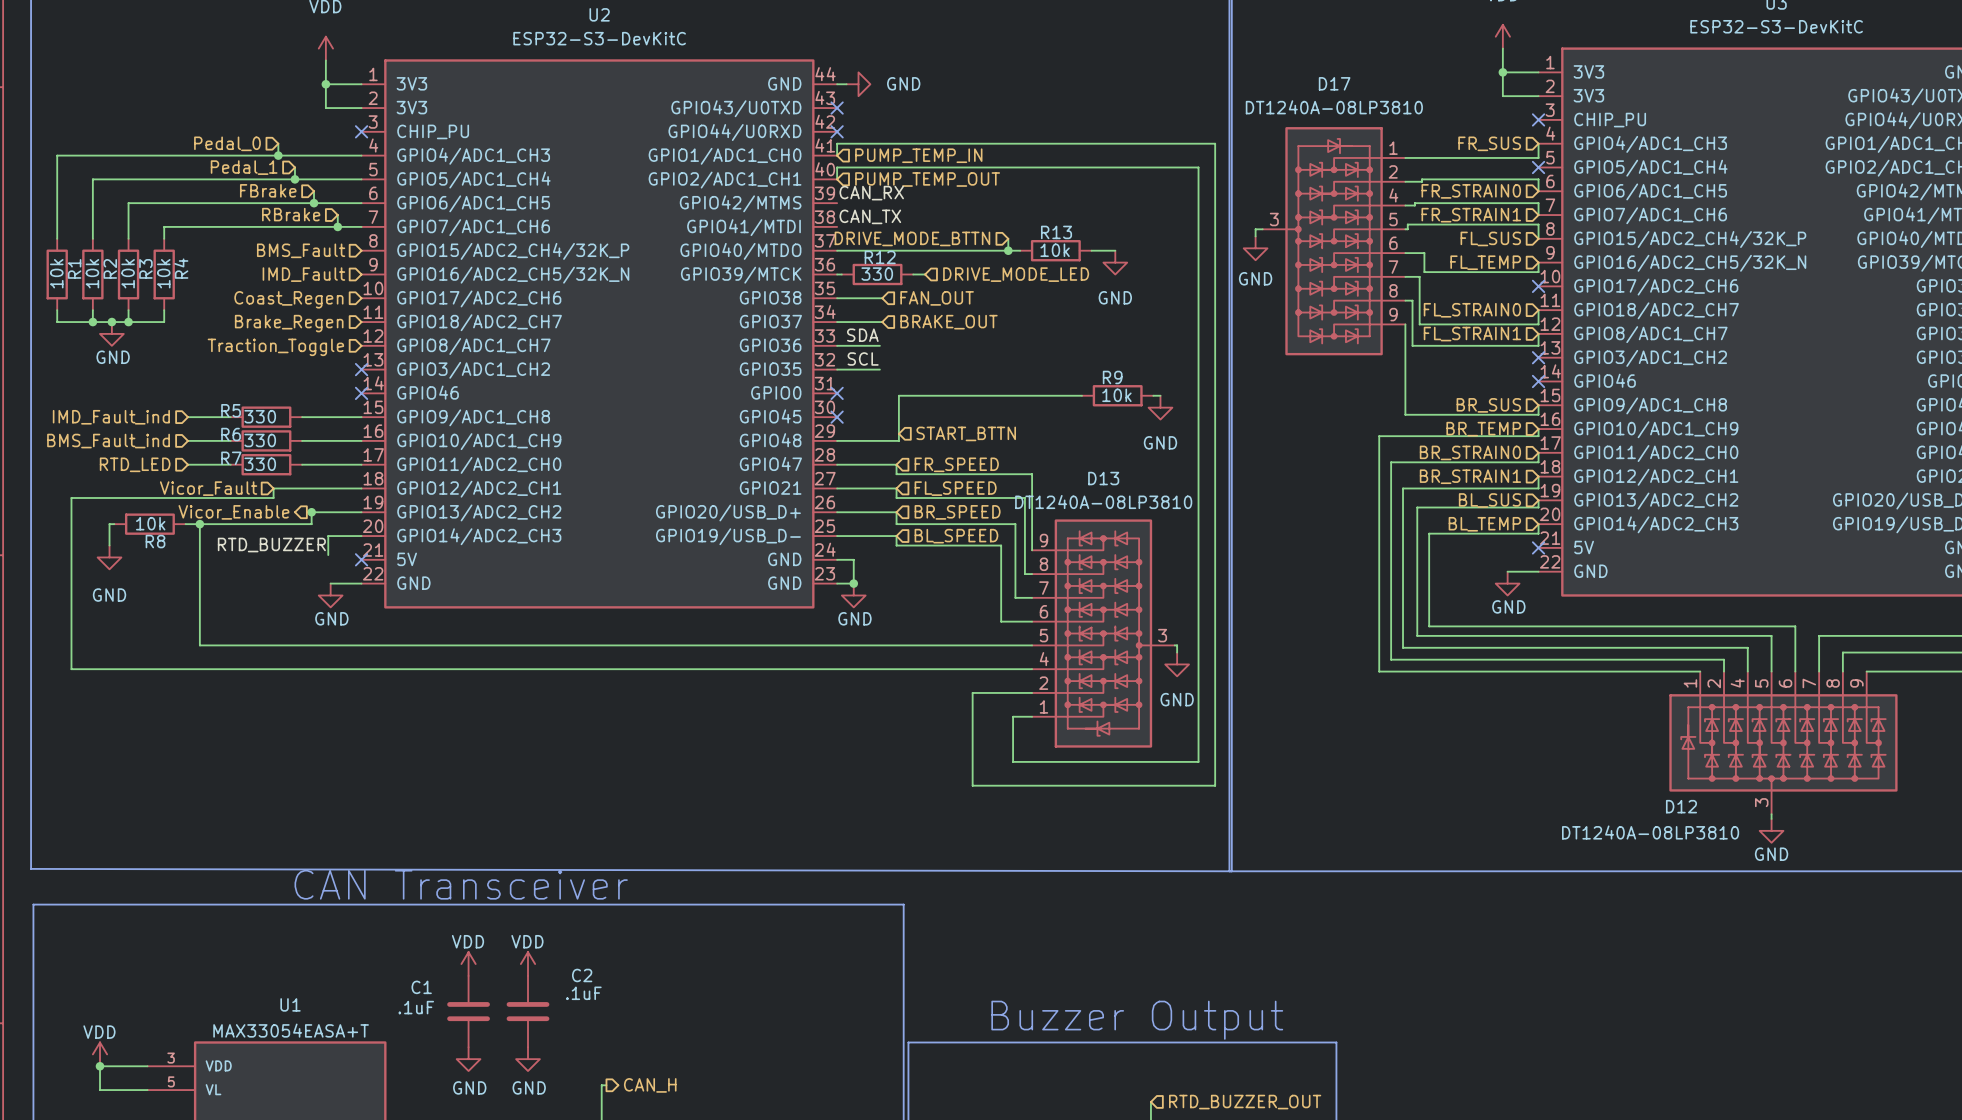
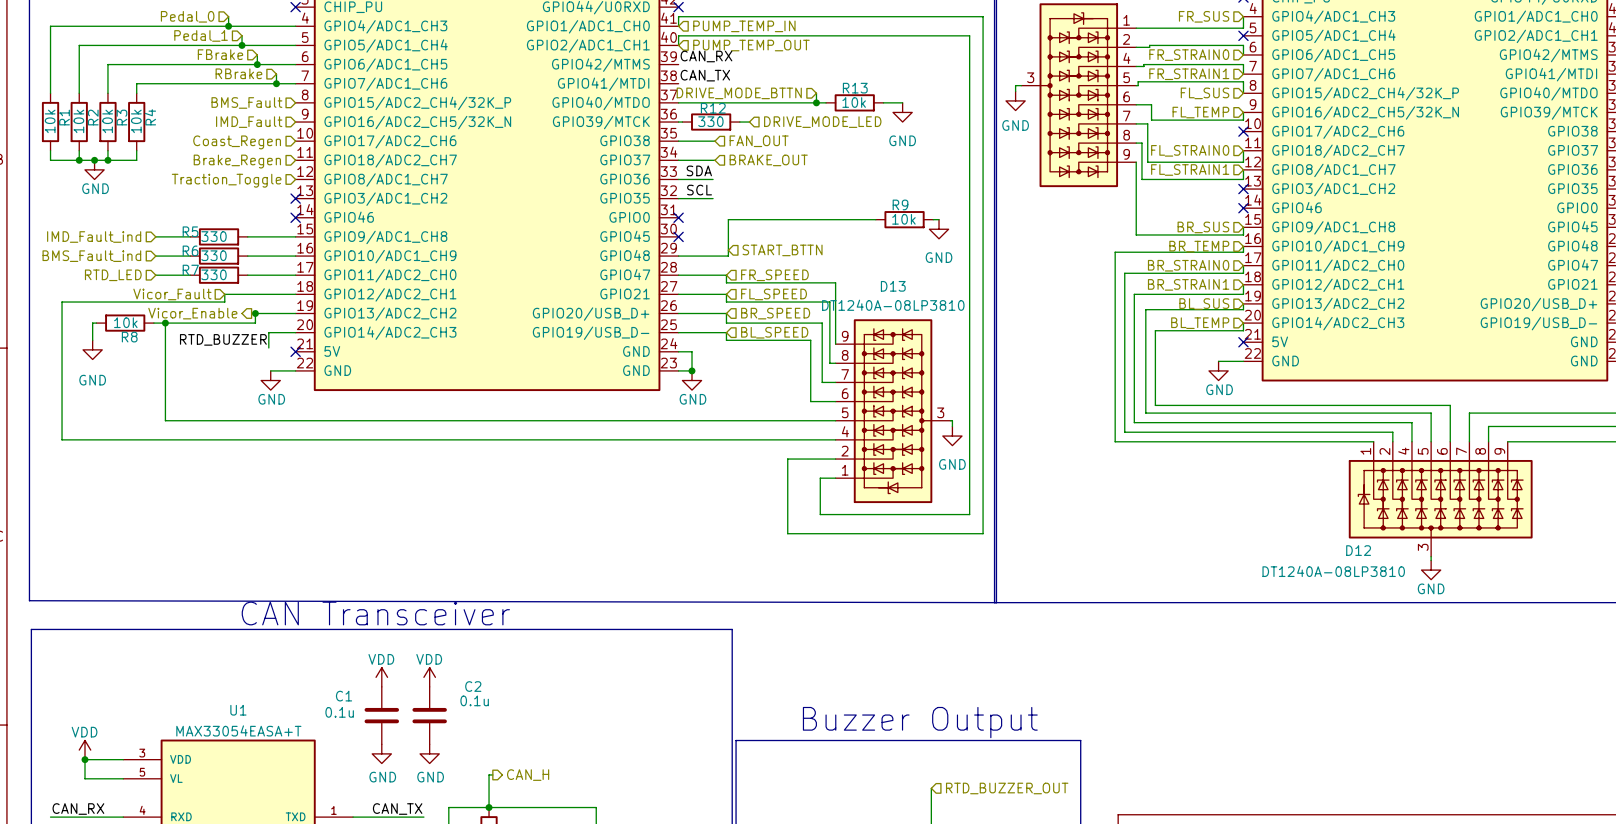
C2 value: .1uF (583, 993) -> 0.1u (474, 700)
C1 value: .1uF (416, 1007) -> 0.1u (339, 712)

